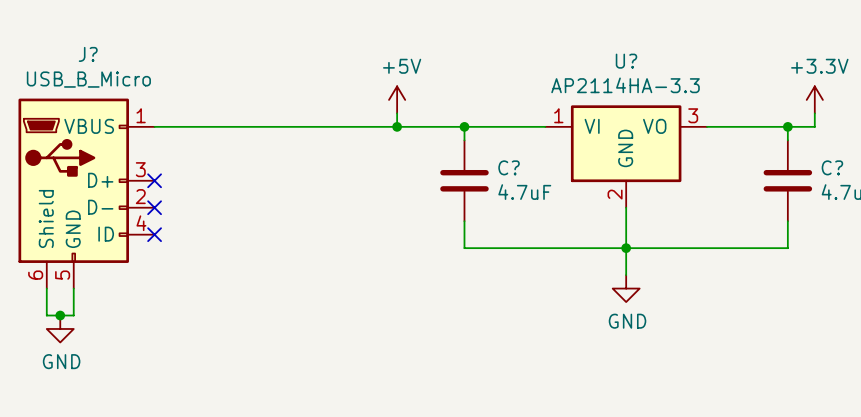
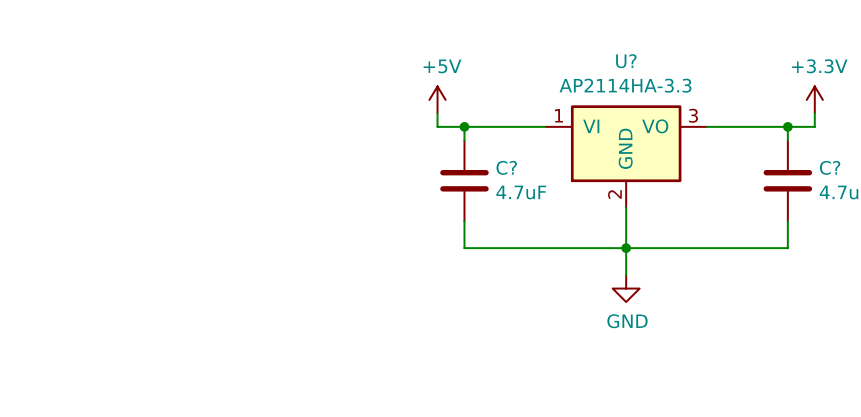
power symbol position: +5V (397, 99) -> +5V (437, 99)
wire: (397, 113) (397, 126) -> none
wire: (154, 126) (437, 126) -> (437, 113) (437, 126)
junction: (397, 126) -> none
no-connect mark: (154, 180) -> none
J?: USB_B_Micro (86, 193) -> none
no-connect mark: (154, 207) -> none
no-connect mark: (154, 234) -> none
wire: (46, 288) (46, 315) (73, 315) (73, 288) -> none
junction: (60, 315) -> none
power symbol: GND (60, 328) -> none

